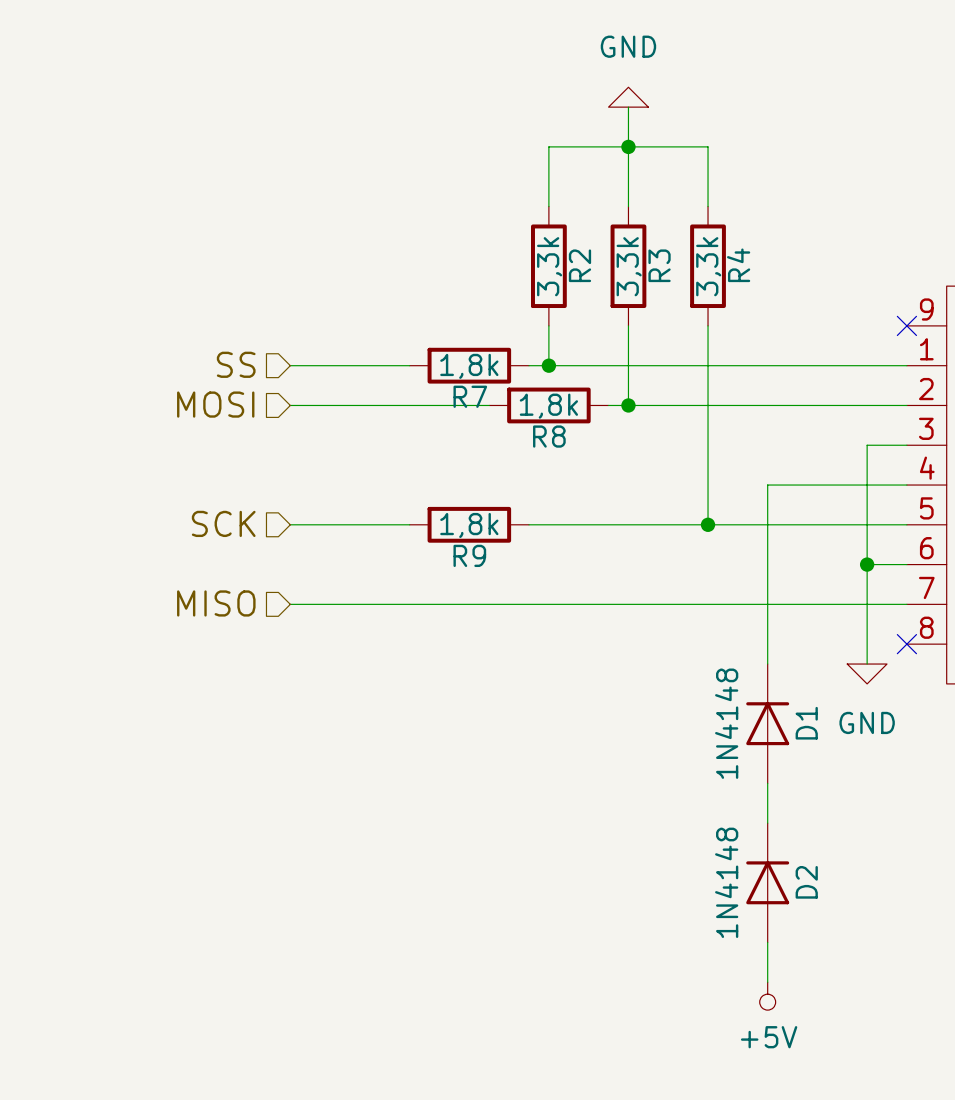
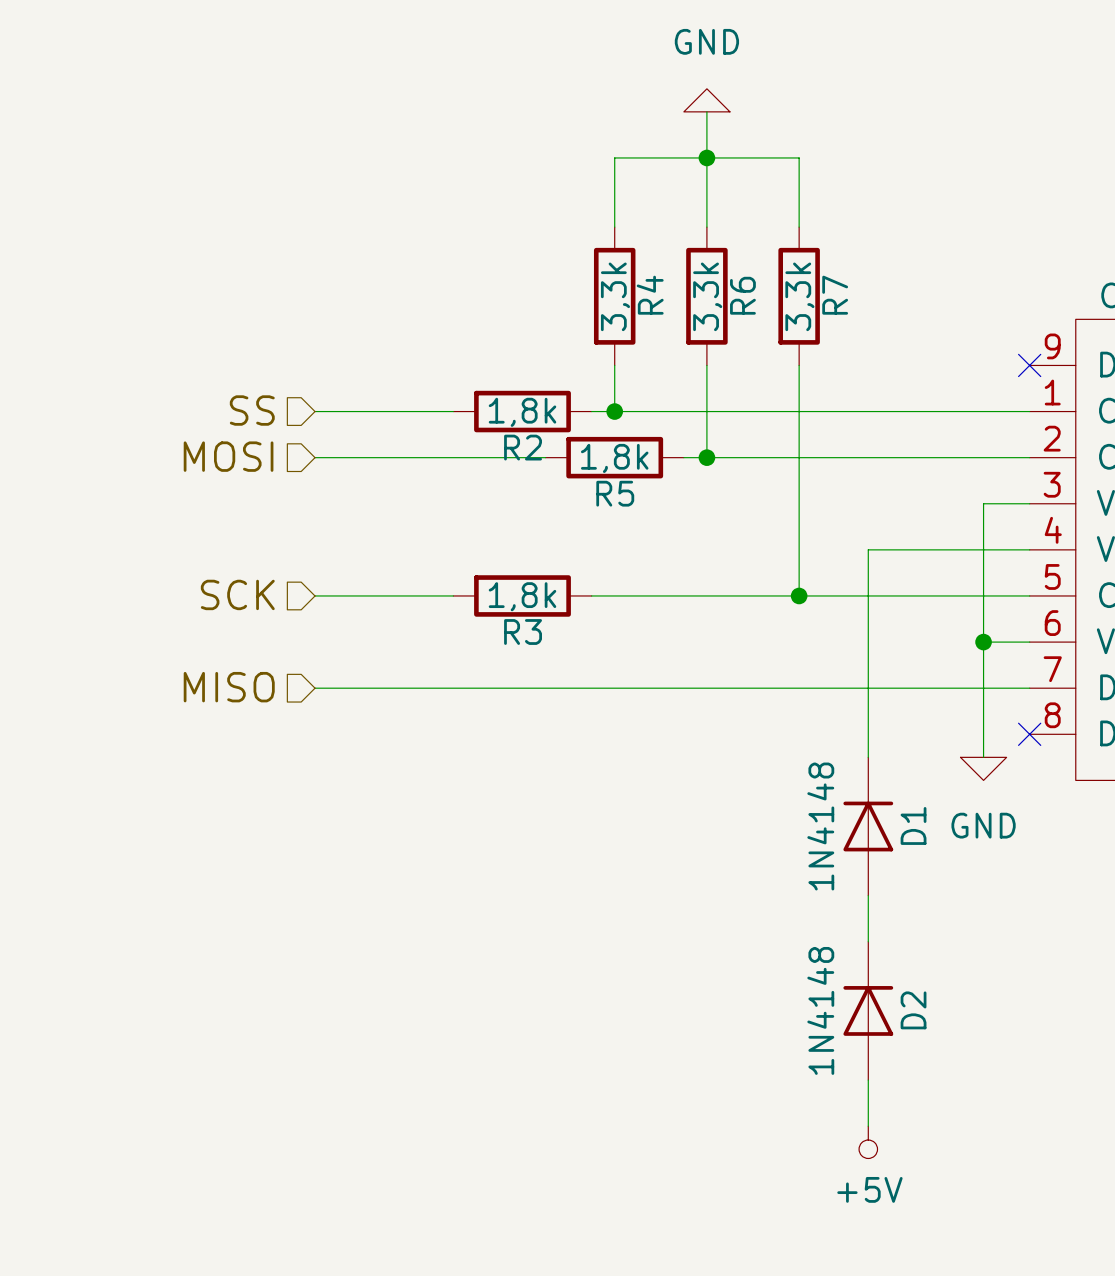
R2 name: R2 (579, 265) -> R4 (650, 295)
R3 name: R3 (659, 265) -> R6 (742, 295)
R4 name: R4 (738, 265) -> R7 (835, 295)
R7 name: R7 (470, 396) -> R2 (523, 447)
R8 name: R8 (549, 436) -> R5 (615, 493)
R9 name: R9 (469, 555) -> R3 (523, 632)

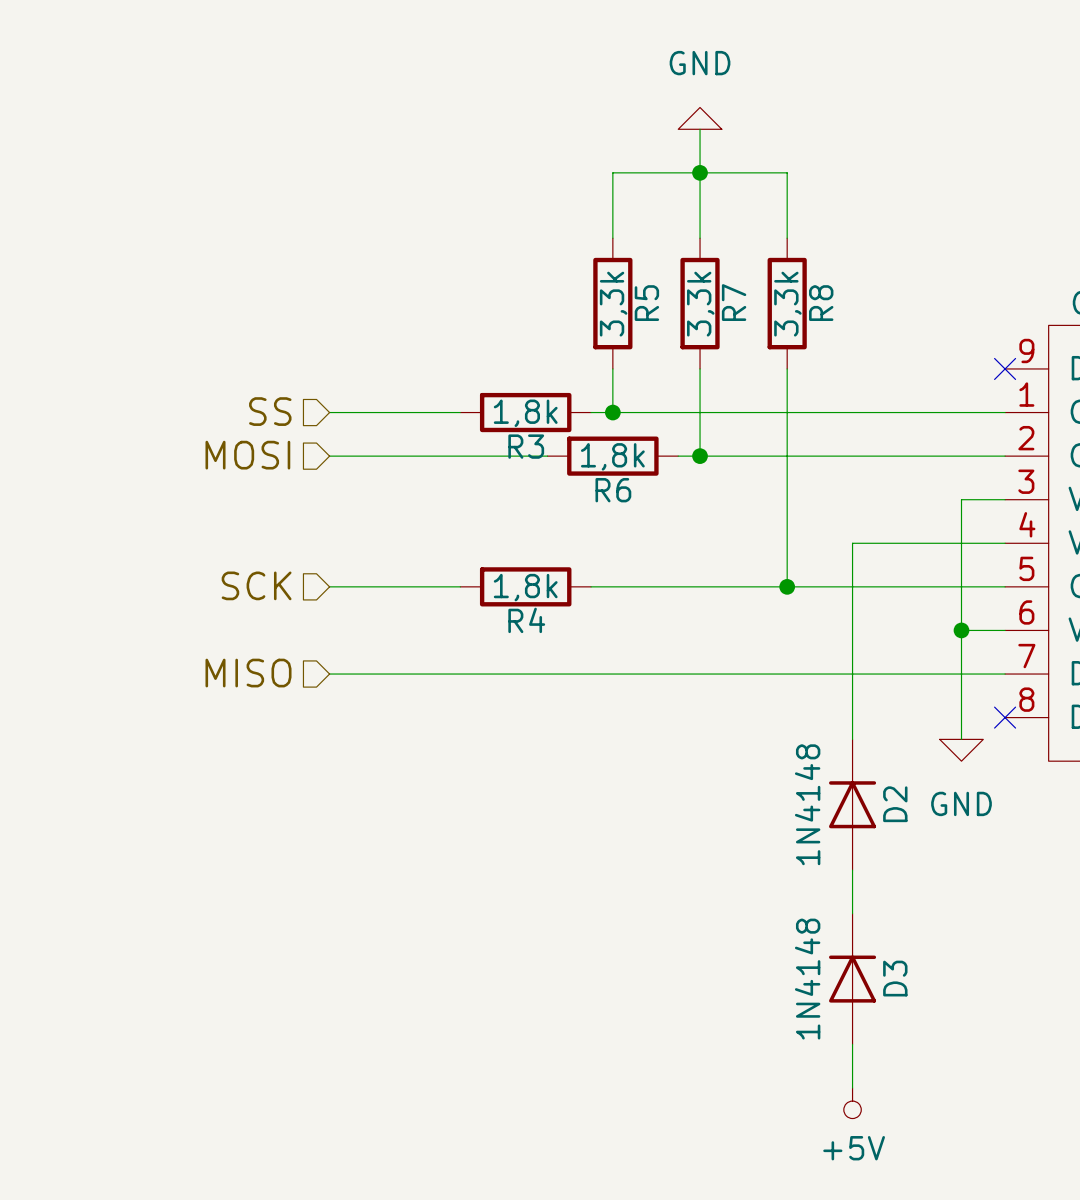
R4 name: R4 (650, 295) -> R5 (646, 303)
R6 name: R6 (742, 295) -> R7 (734, 302)
R7 name: R7 (835, 295) -> R8 (821, 303)
R2 name: R2 (523, 447) -> R3 (526, 446)
R5 name: R5 (615, 493) -> R6 (613, 490)
R3 name: R3 (523, 632) -> R4 (526, 620)
D1 name: D1 (913, 825) -> D2 (895, 804)
D2 name: D2 (913, 1010) -> D3 (895, 978)

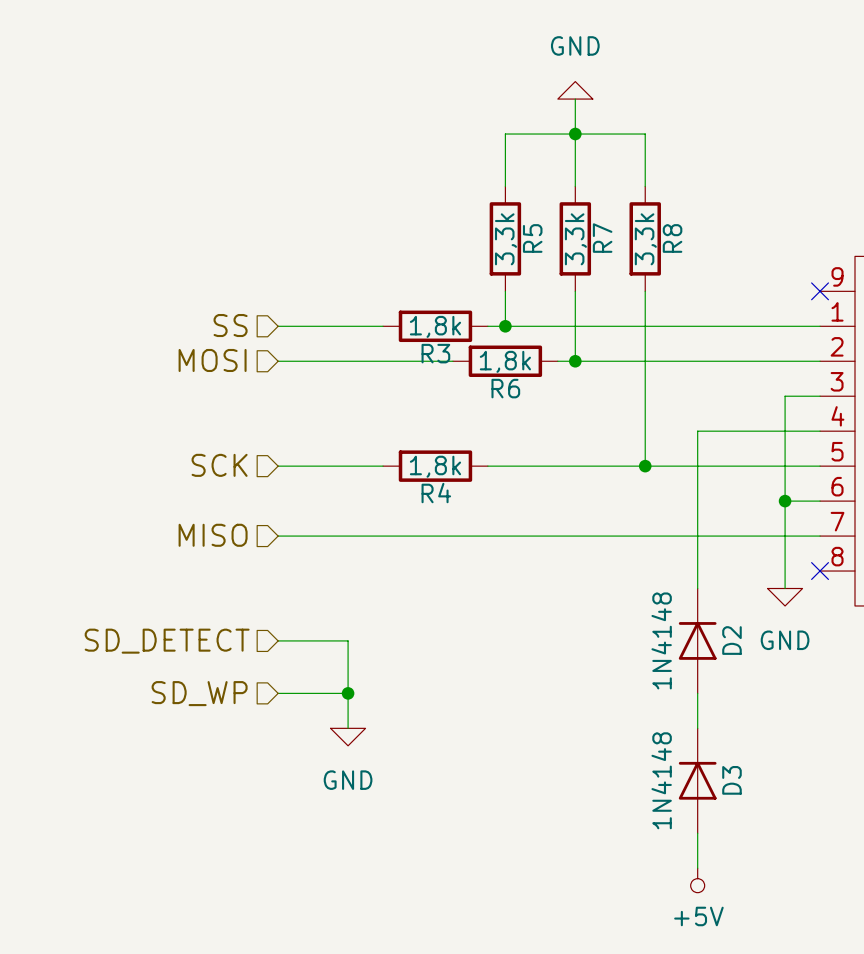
wire: none -> (278, 640) (348, 640) (348, 728)
hierarchical label: none -> SD_DETECT (167, 641)
hierarchical label: none -> SD_WP (199, 693)
wire: none -> (278, 693) (348, 693)
junction: none -> (348, 693)
power symbol: none -> GND (348, 737)

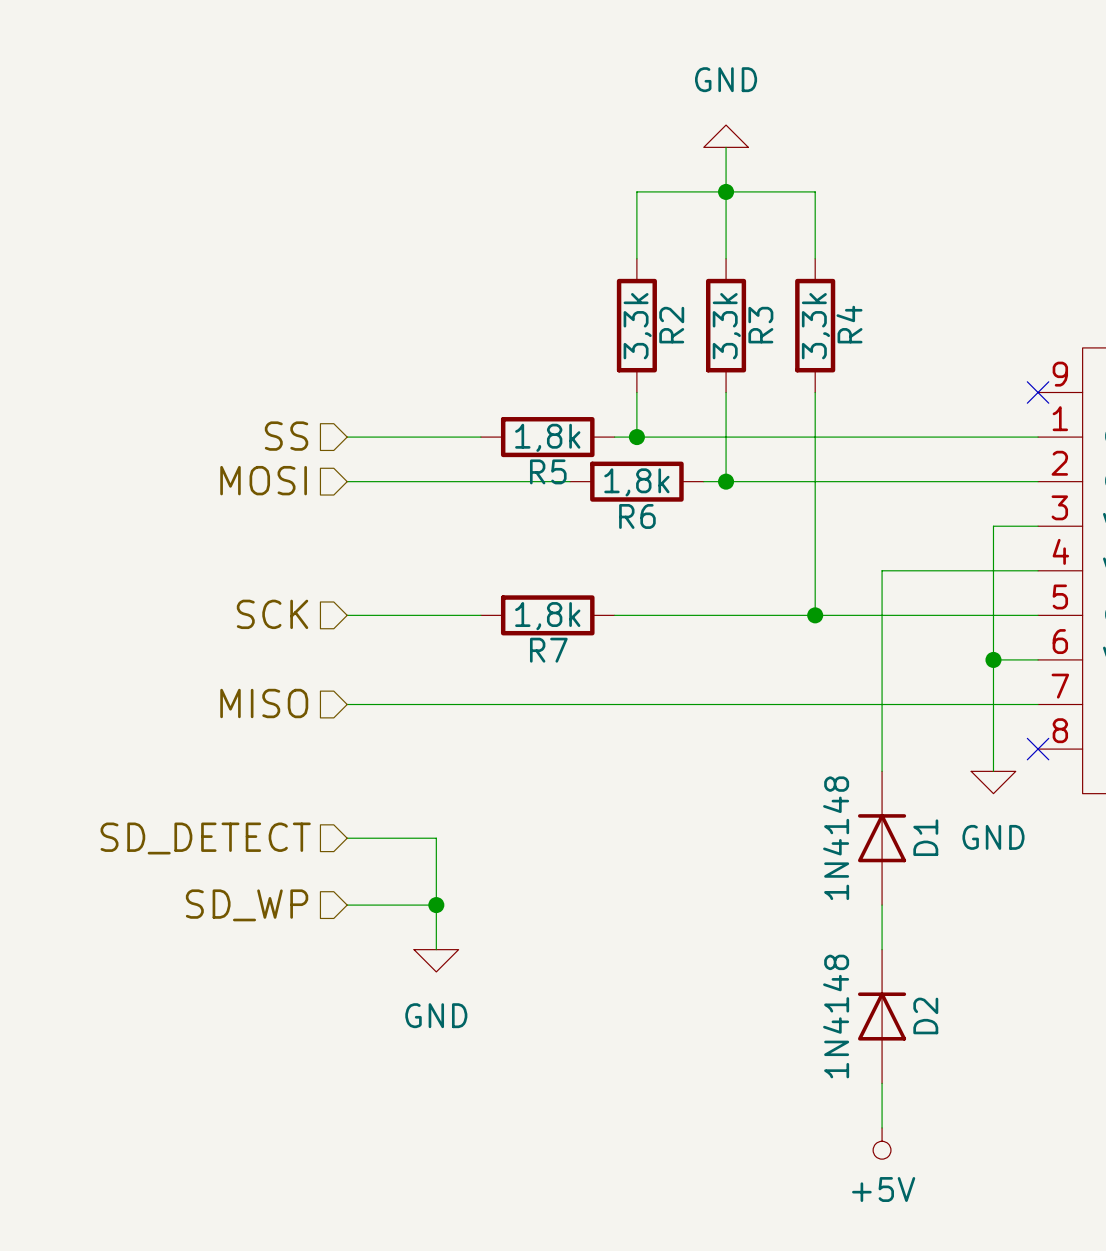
R5 name: R5 (532, 238) -> R2 (671, 325)
R7 name: R7 (602, 238) -> R3 (760, 325)
R8 name: R8 (672, 238) -> R4 (849, 324)
R3 name: R3 (435, 353) -> R5 (548, 471)
R4 name: R4 (436, 493) -> R7 (548, 650)
D2 name: D2 (731, 640) -> D1 (925, 837)
D3 name: D3 (731, 780) -> D2 (925, 1015)

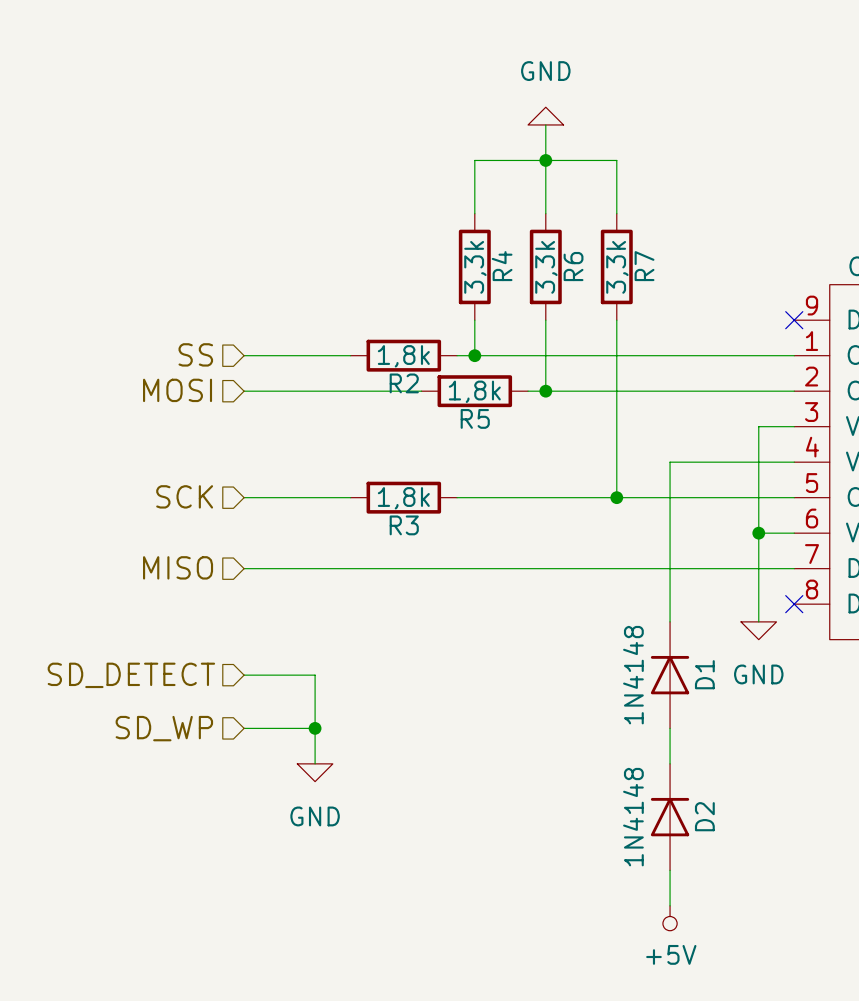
R4 name: R4 (849, 324) -> R7 (644, 266)
R2 name: R2 (671, 325) -> R4 (502, 266)
R3 name: R3 (760, 325) -> R6 (573, 266)
R5 name: R5 (548, 471) -> R2 (404, 383)
R6 name: R6 (637, 516) -> R5 (475, 418)
R7 name: R7 (548, 650) -> R3 (404, 525)

